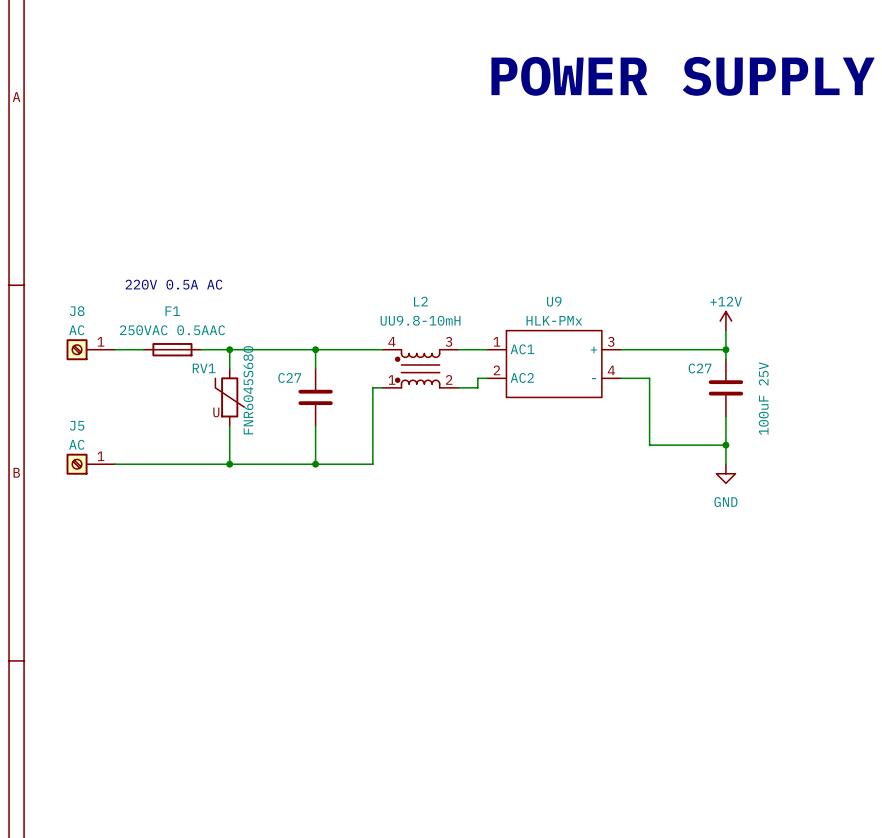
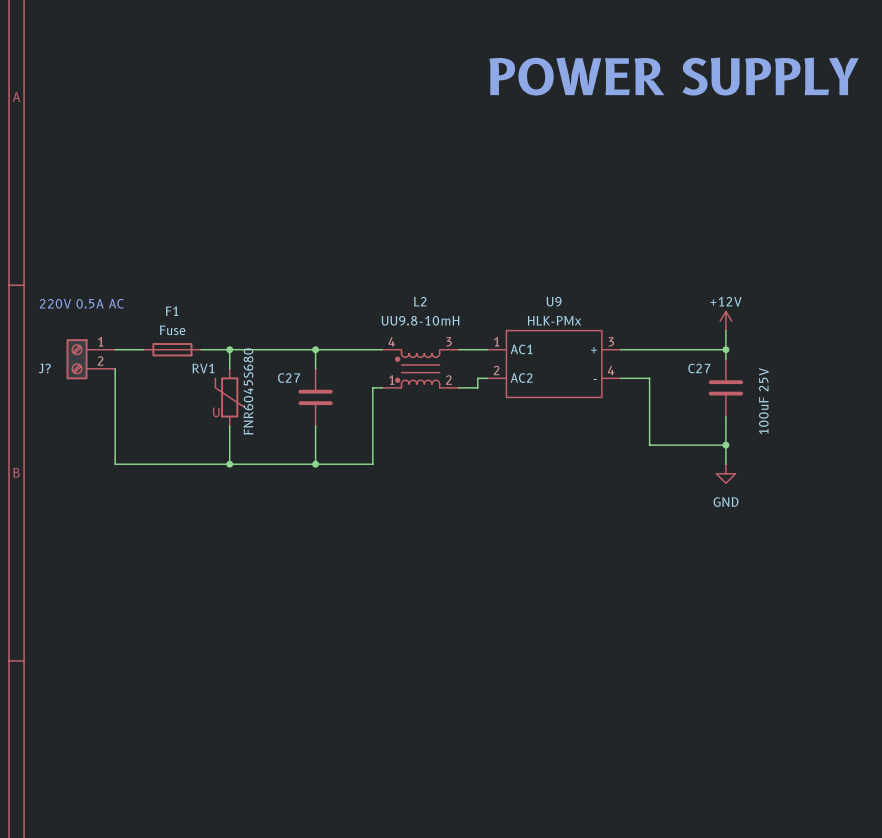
text position: 220V 0.5A AC (173, 284) -> 220V 0.5A AC (81, 303)
F1 value: 250VAC 0.5AAC (172, 330) -> Fuse (172, 330)
J8: AC (90, 349) -> none
J?: none -> (90, 359)
wire: none -> (115, 368) (115, 464)
J5: AC (90, 464) -> none

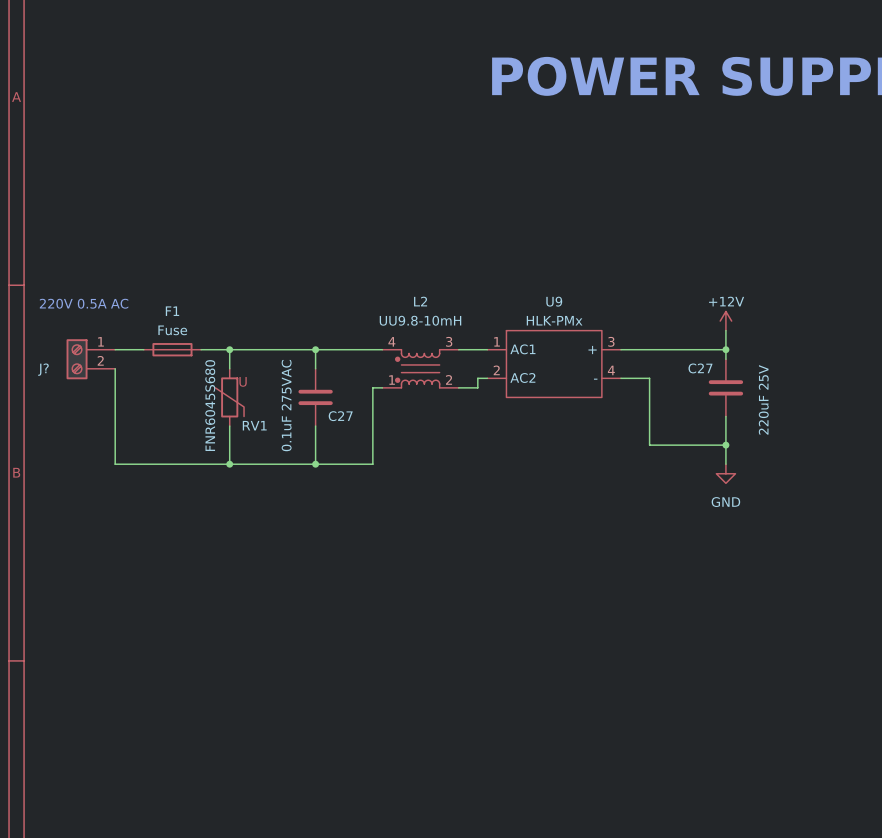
C27 name position: C27 (289, 378) -> C27 (340, 416)
RV1 rotation: 0° (229, 397) -> 180° (229, 397)
C27 value: 100uF 25V (763, 401) -> 220uF 25V (763, 399)
C27 value: none -> 0.1uF 275VAC (286, 405)

